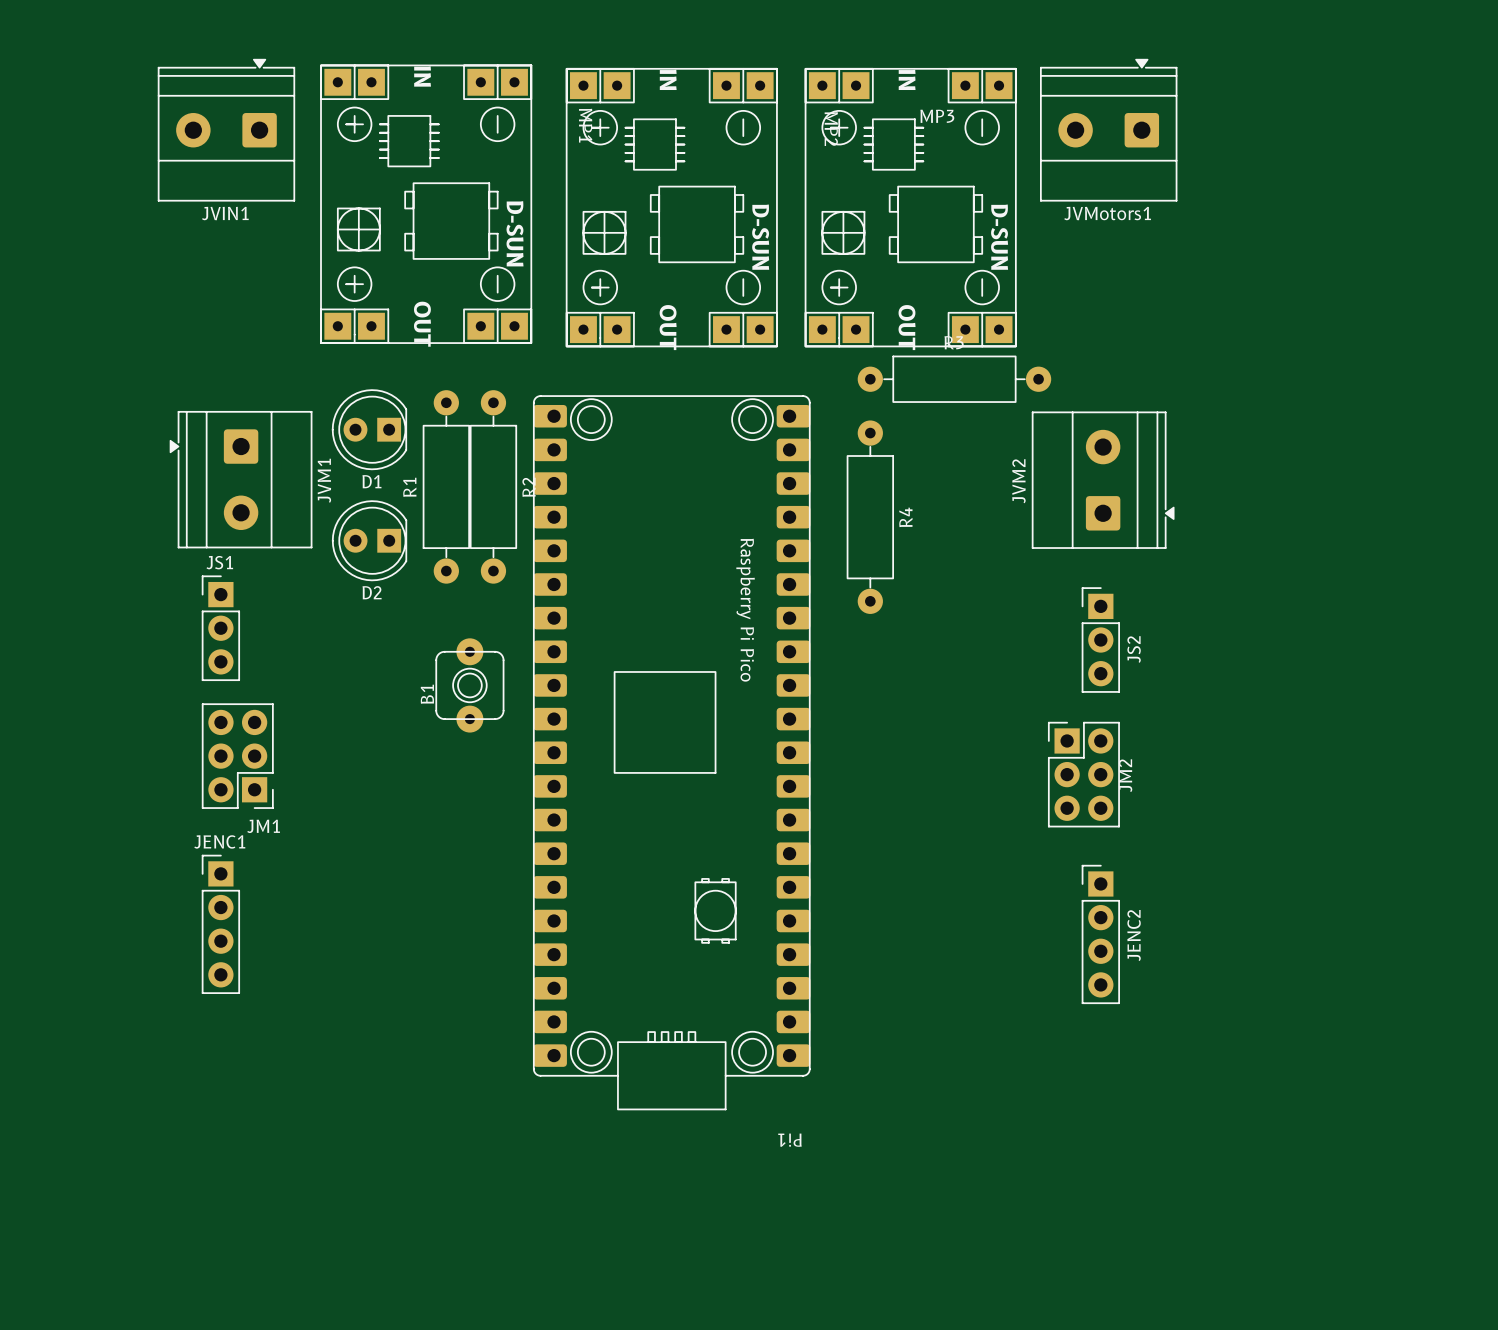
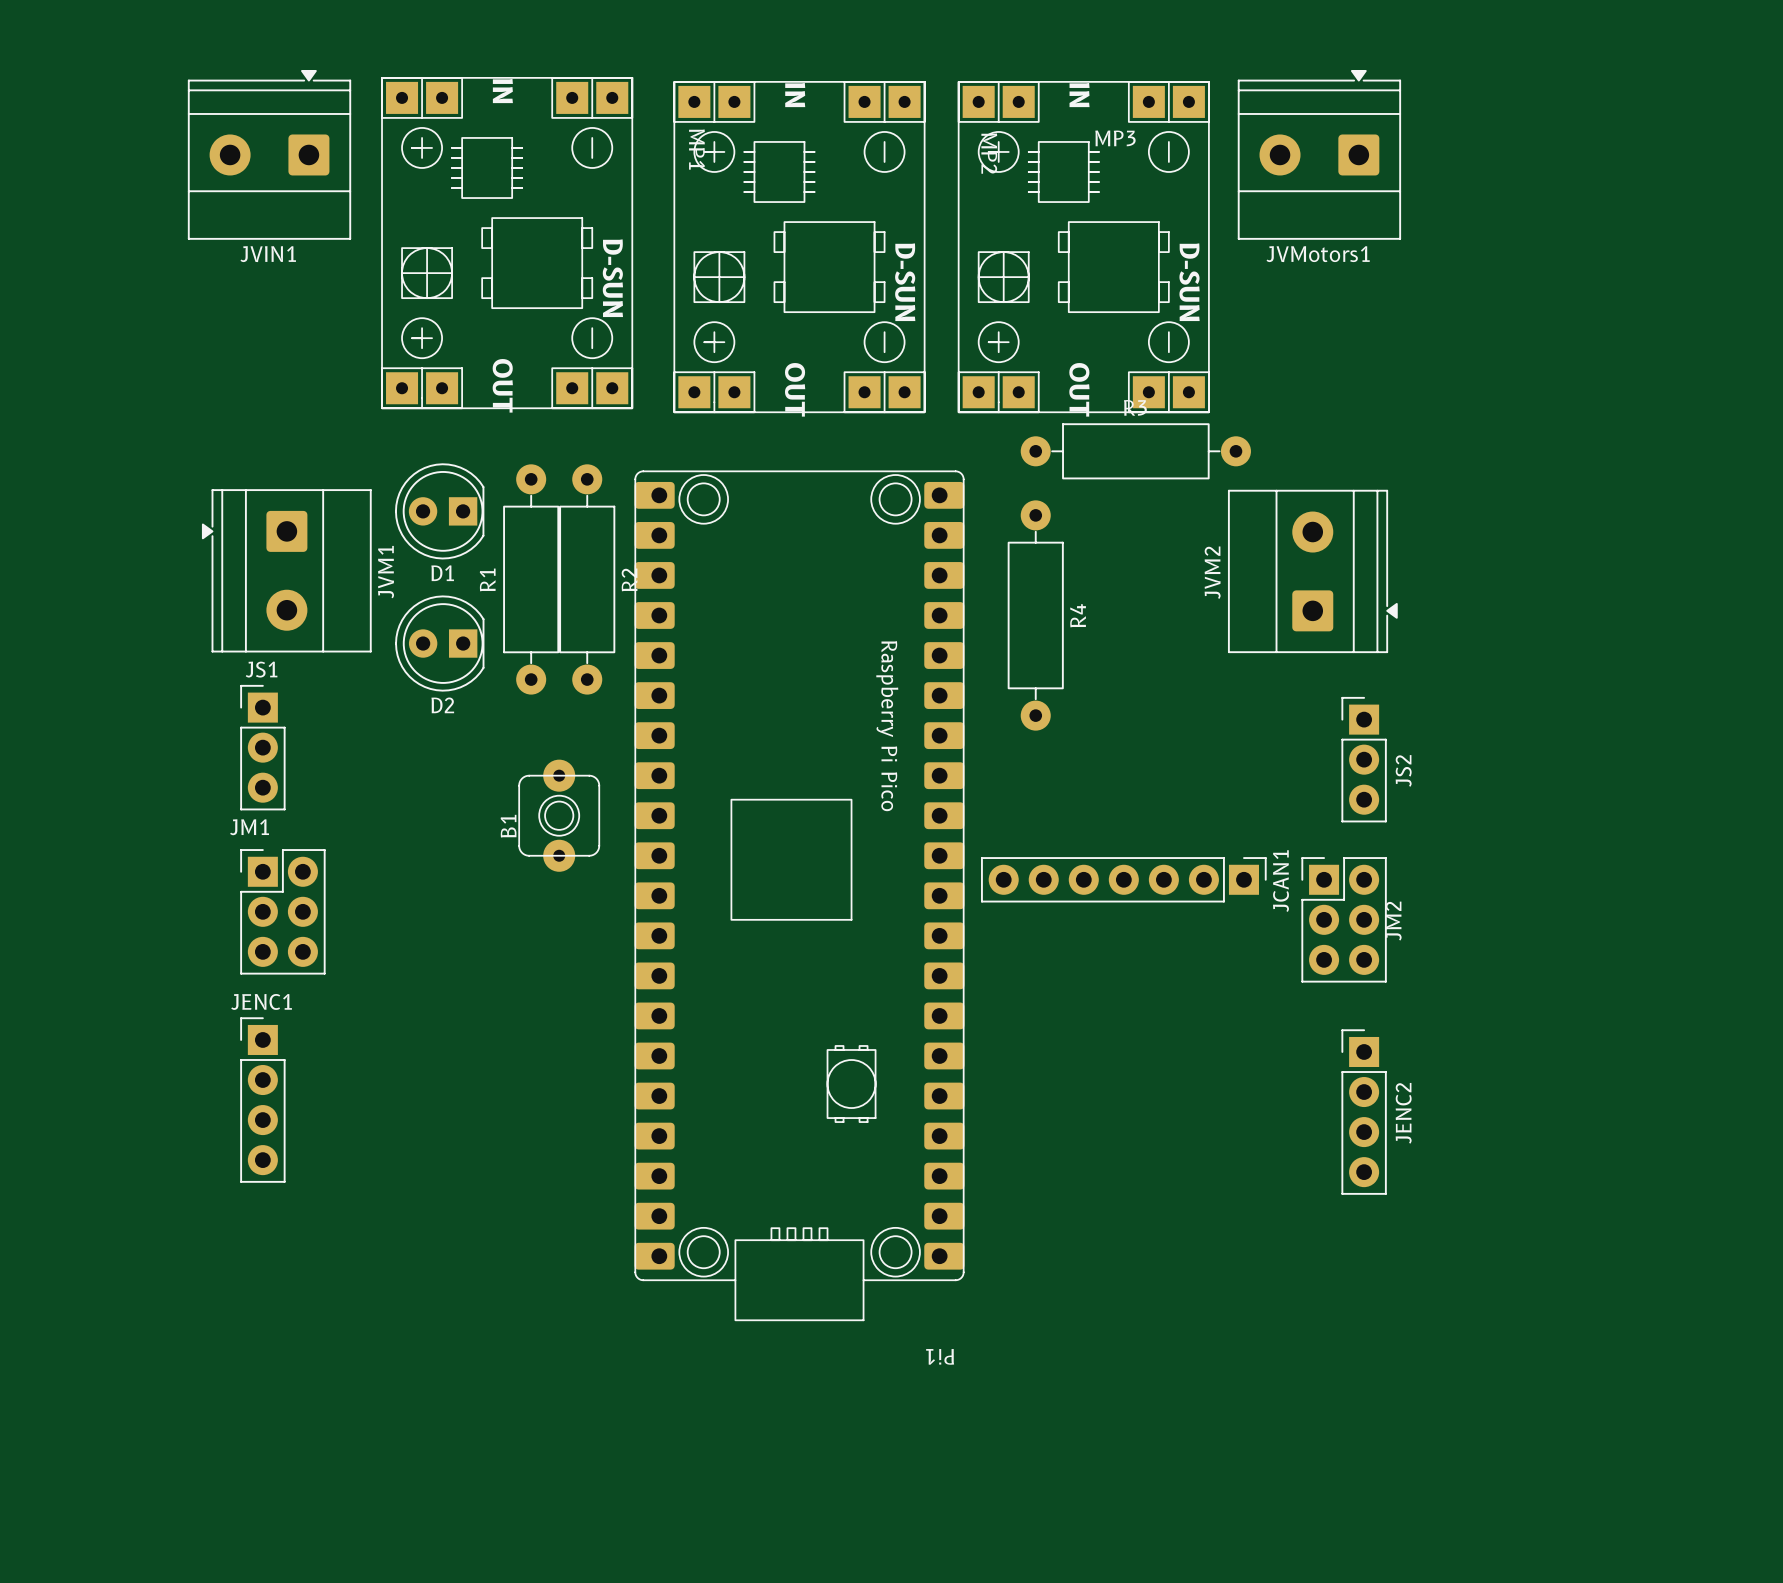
JS2 position: (1100, 640) -> (1364, 759)
JCAN1: none -> (1123, 879)
JM1 rotation: 0° (237, 756) -> 180° (282, 911)
JM2 position: (1083, 774) -> (1344, 919)
JENC2 position: (1100, 934) -> (1364, 1112)

